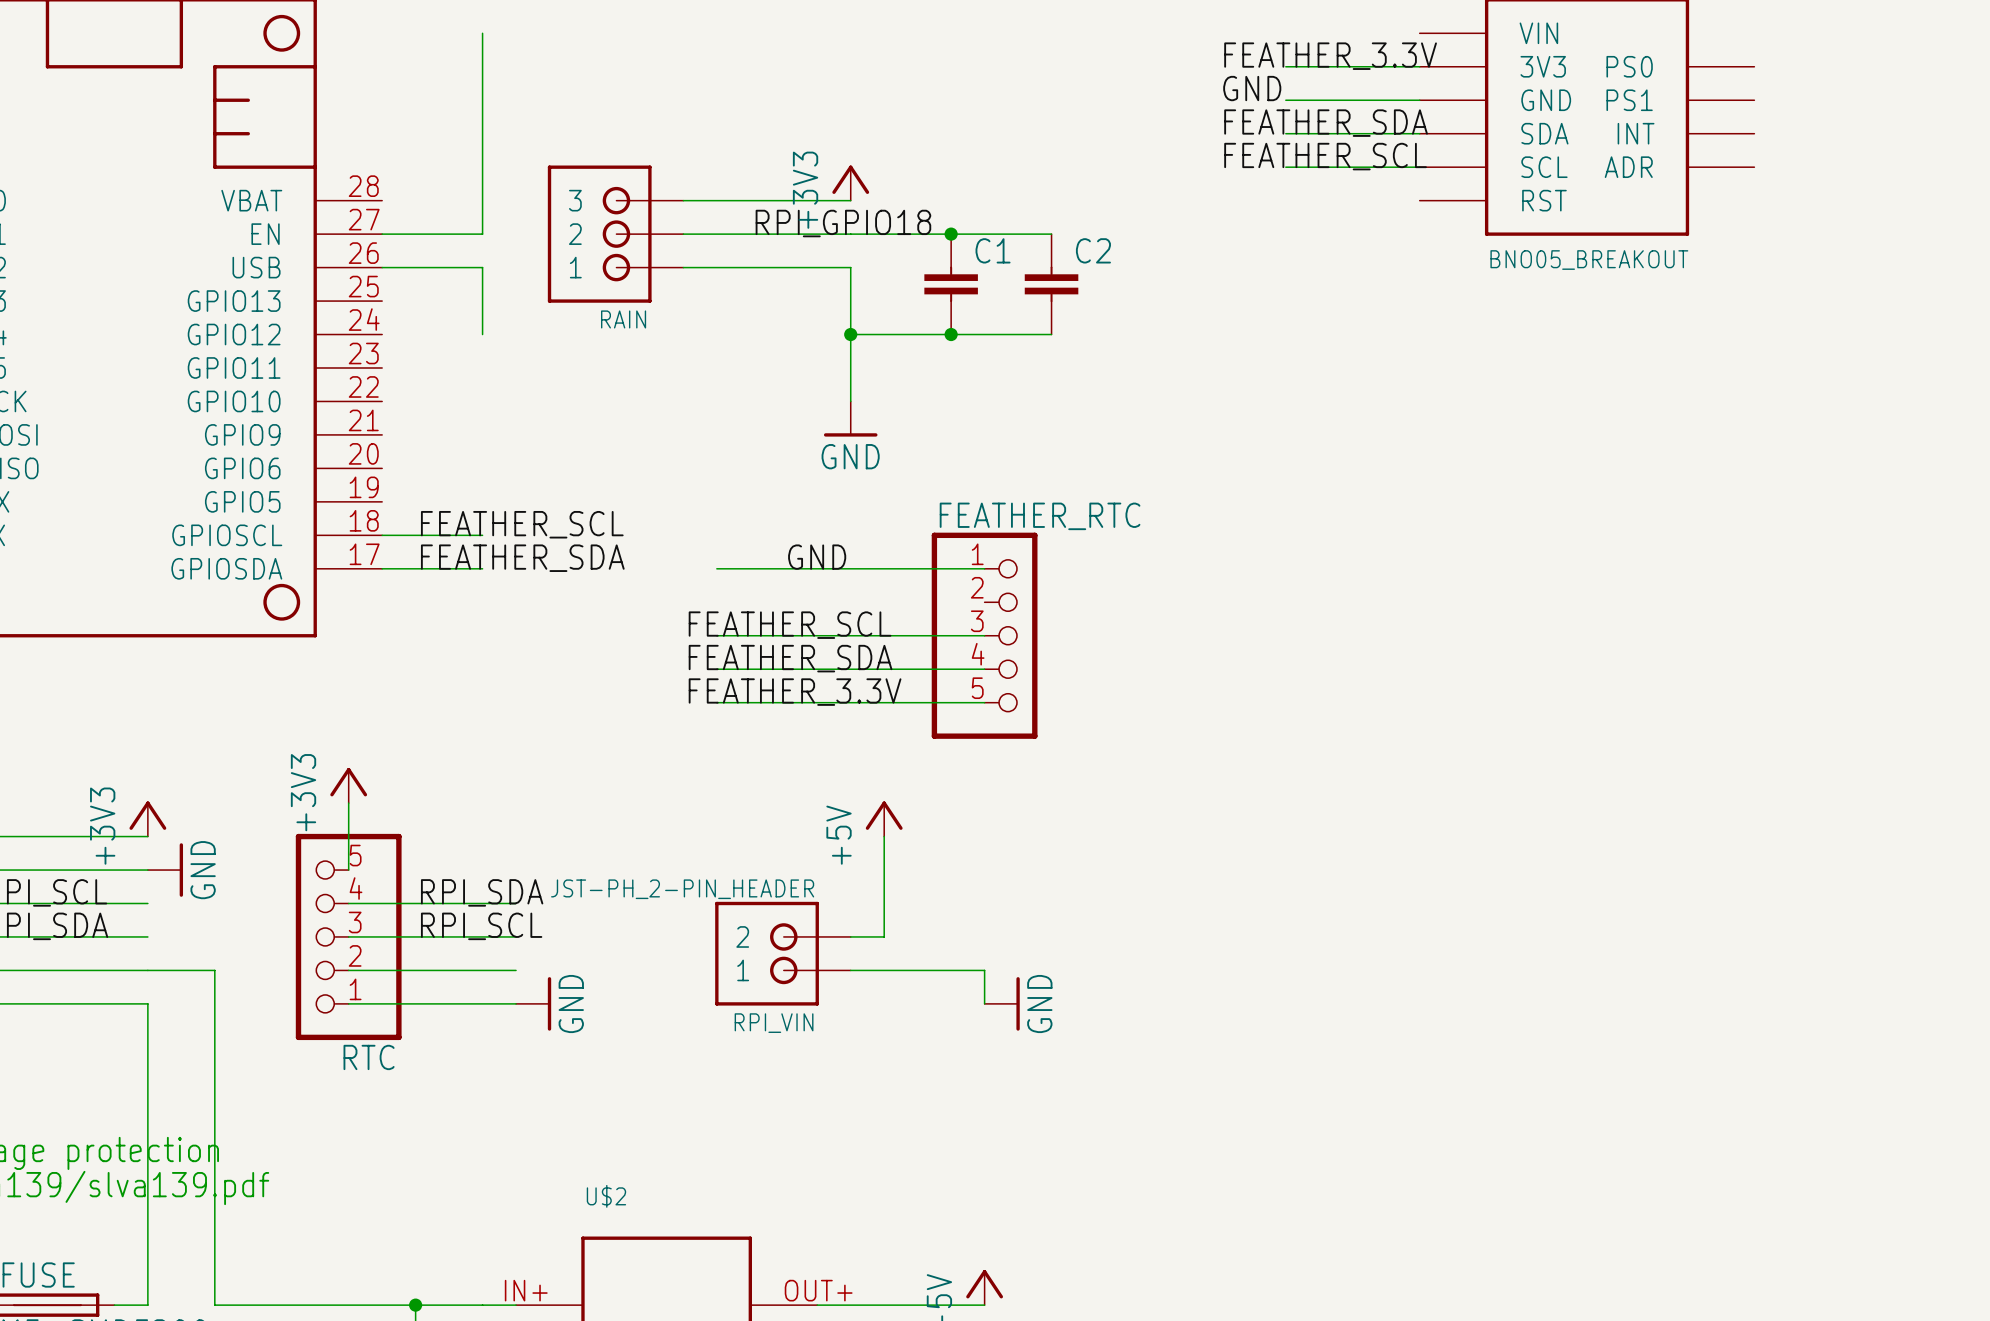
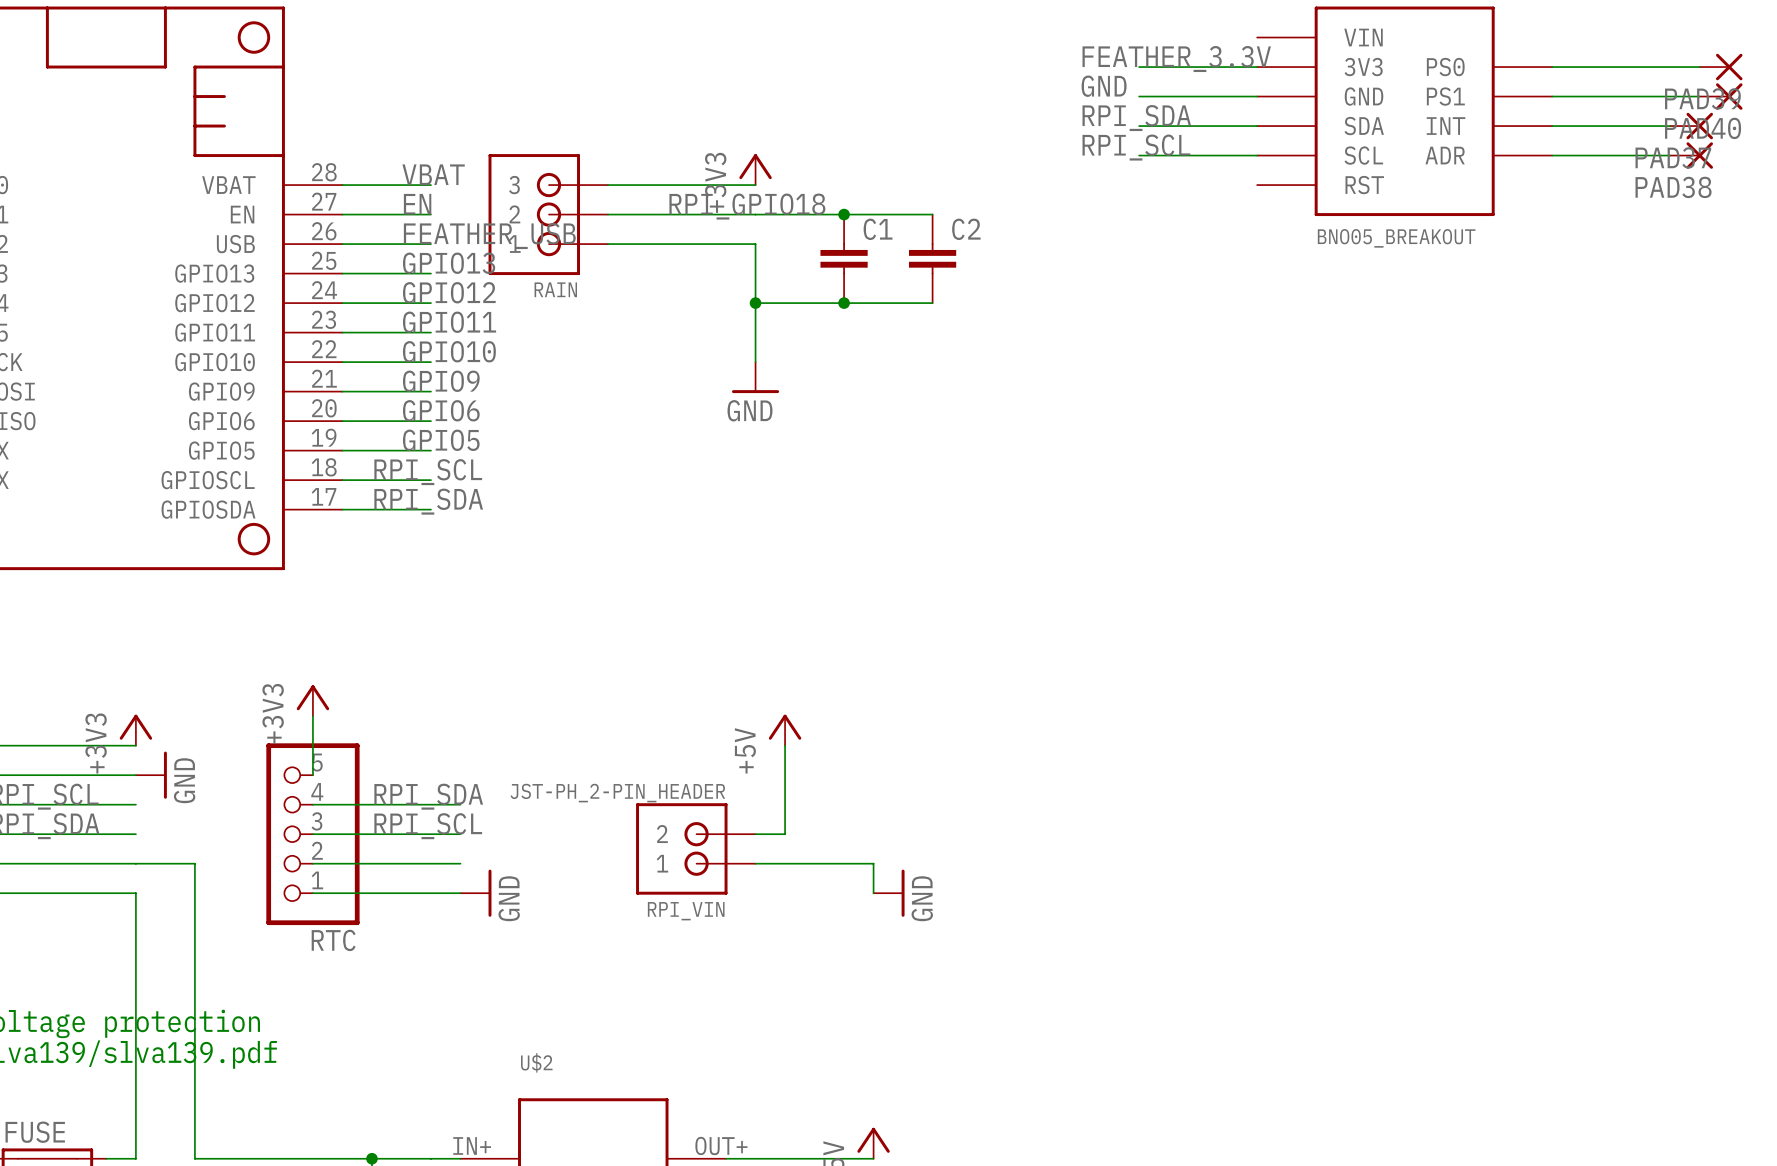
wire: (482, 33) (482, 234) -> none
wire: none -> (1552, 67) (1699, 67)
PAD39: none -> (1721, 67)
wire: none -> (1552, 96) (1699, 96)
PAD40: none -> (1721, 96)
label: FEATHER_SDA (1326, 123) -> RPI_SDA (1136, 118)
wire: none -> (1552, 126) (1670, 126)
PAD37: none -> (1691, 126)
label: FEATHER_SCL (1325, 156) -> RPI_SCL (1136, 147)
wire: none -> (1552, 155) (1670, 155)
PAD38: none -> (1691, 155)
label: none -> VBAT (433, 174)
wire: none -> (342, 185) (430, 185)
label: none -> EN (417, 204)
label: none -> FEATHER_USB (489, 236)
wire: (482, 267) (482, 334) -> (342, 303) (430, 303)
label: none -> GPIO13 (449, 263)
wire: none -> (342, 273) (430, 273)
label: none -> GPIO12 (449, 292)
label: none -> GPIO11 (449, 322)
wire: none -> (342, 332) (430, 332)
label: none -> GPIO10 (449, 351)
wire: none -> (342, 362) (430, 362)
label: none -> GPIO9 (441, 381)
wire: none -> (342, 391) (430, 391)
label: none -> GPIO6 (441, 410)
wire: none -> (342, 421) (430, 421)
label: none -> GPIO5 (441, 440)
wire: none -> (342, 450) (430, 450)
label: FEATHER_SCL (522, 524) -> RPI_SCL (428, 472)
label: GND (817, 557) -> none
label: FEATHER_SDA (522, 558) -> RPI_SDA (428, 501)
wire: (716, 568) (984, 568) -> none
label: FEATHER_SCL (790, 625) -> none
wire: (716, 635) (984, 635) -> none
FEATHER_RTC: (984, 635) -> none
label: FEATHER_SDA (790, 658) -> none
wire: (716, 669) (984, 669) -> none
label: FEATHER_3.3V (795, 692) -> none
wire: (716, 702) (984, 702) -> none

